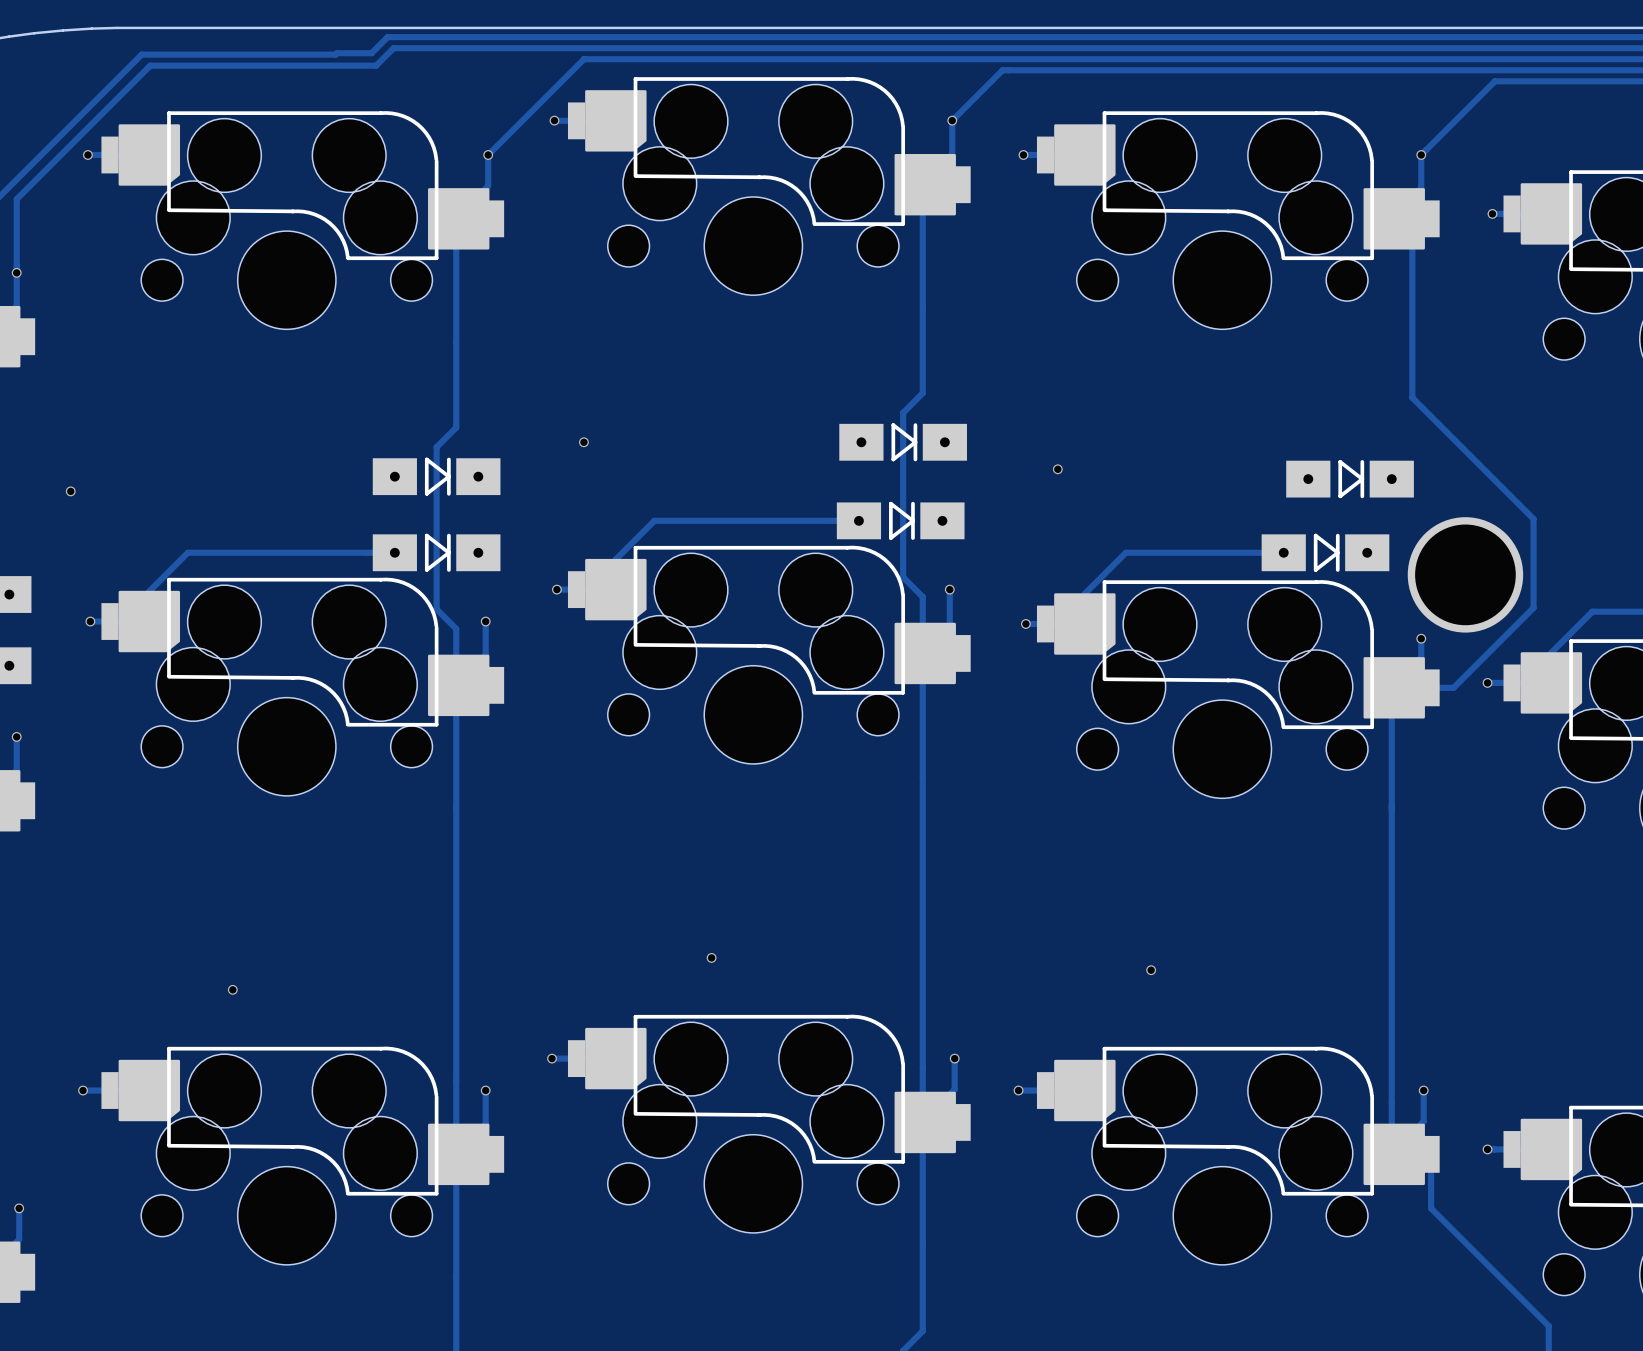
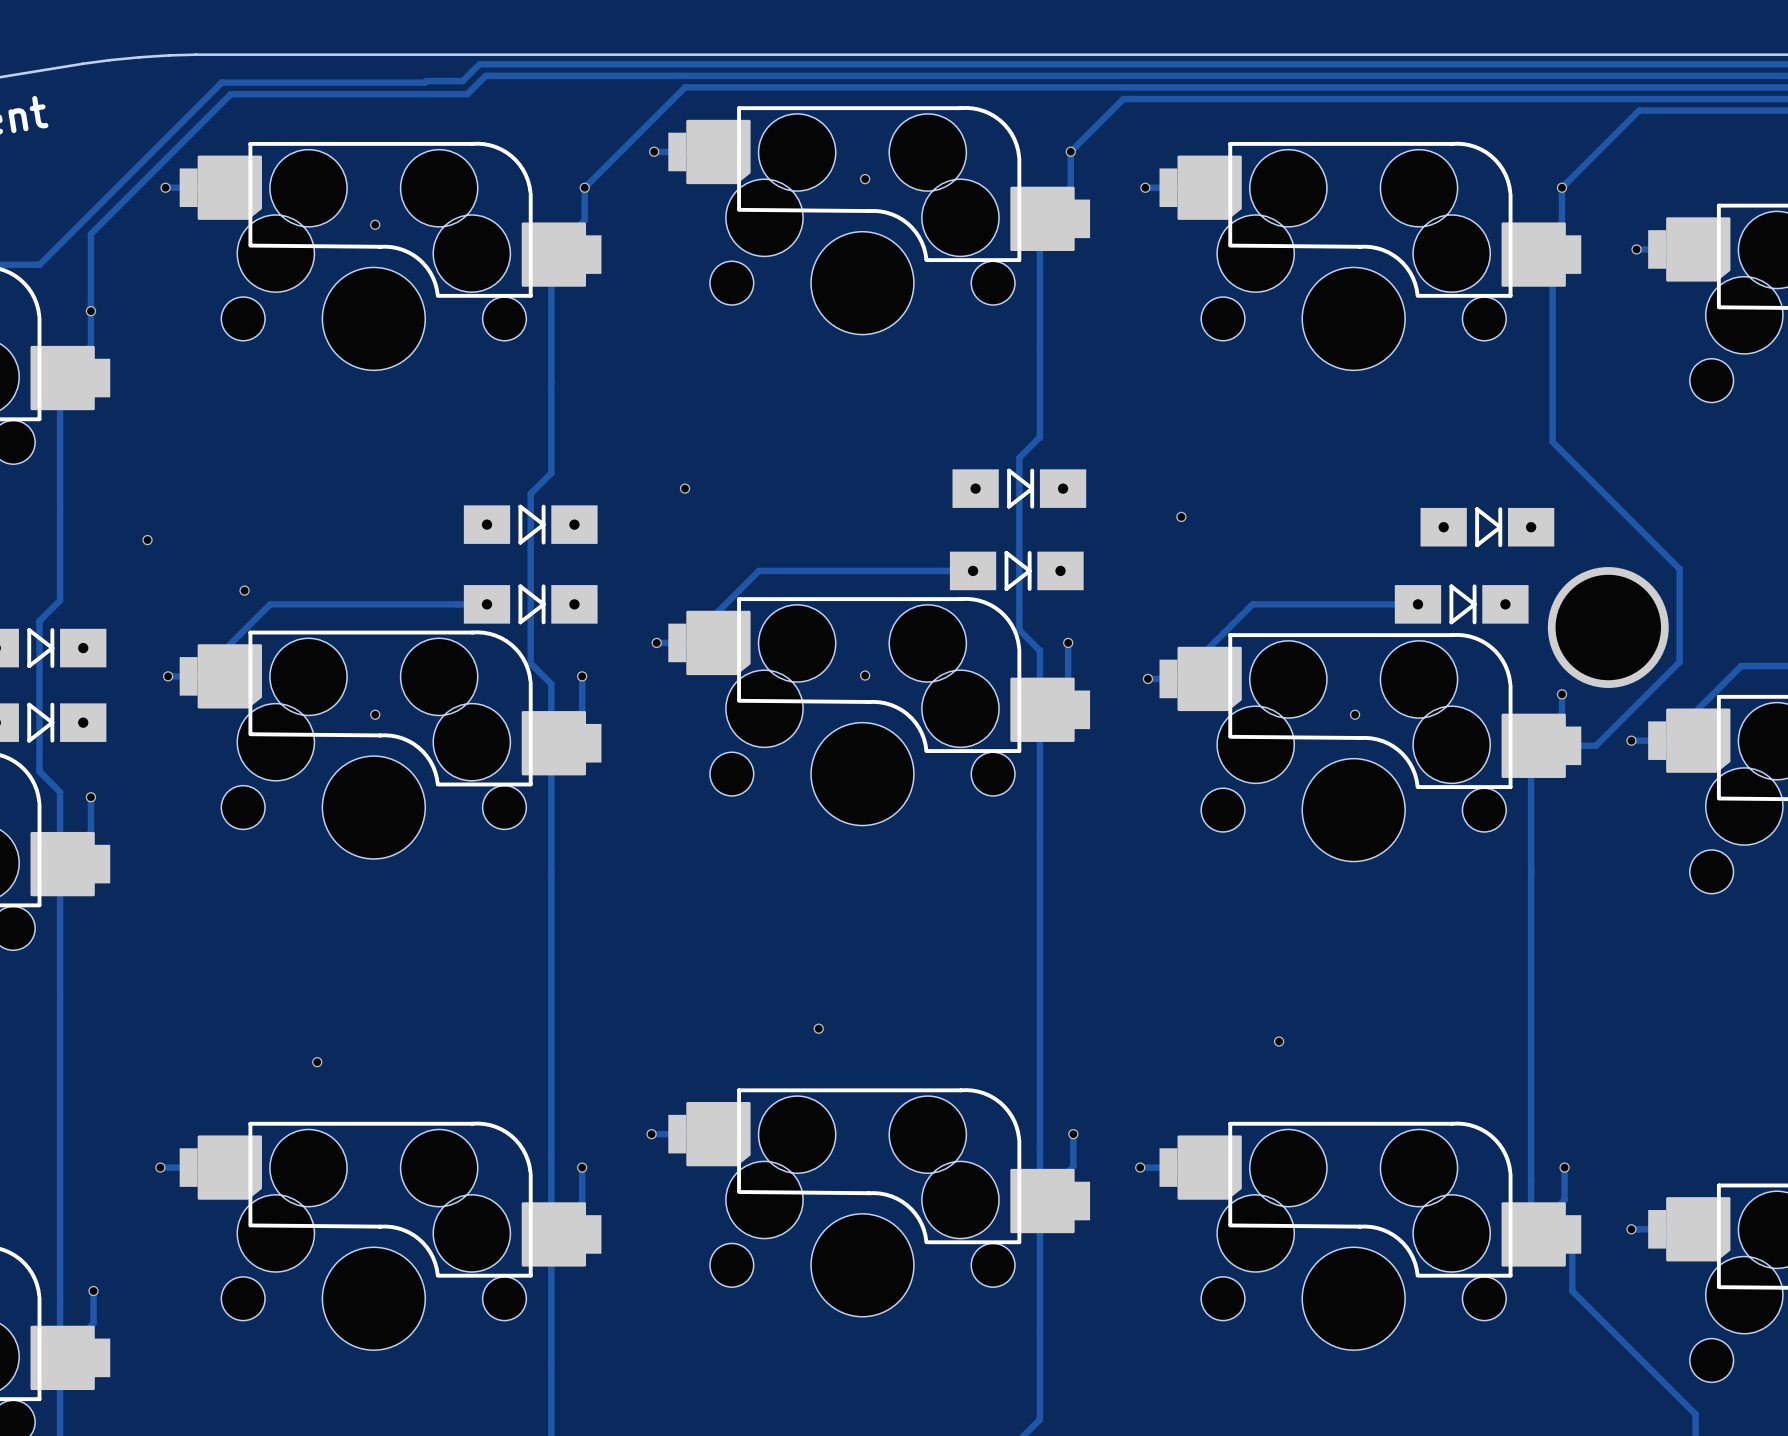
via: none -> (865, 179)
via: none -> (375, 224)
via: none -> (244, 590)
via: none -> (865, 675)
via: none -> (375, 714)
via: none -> (1355, 714)

